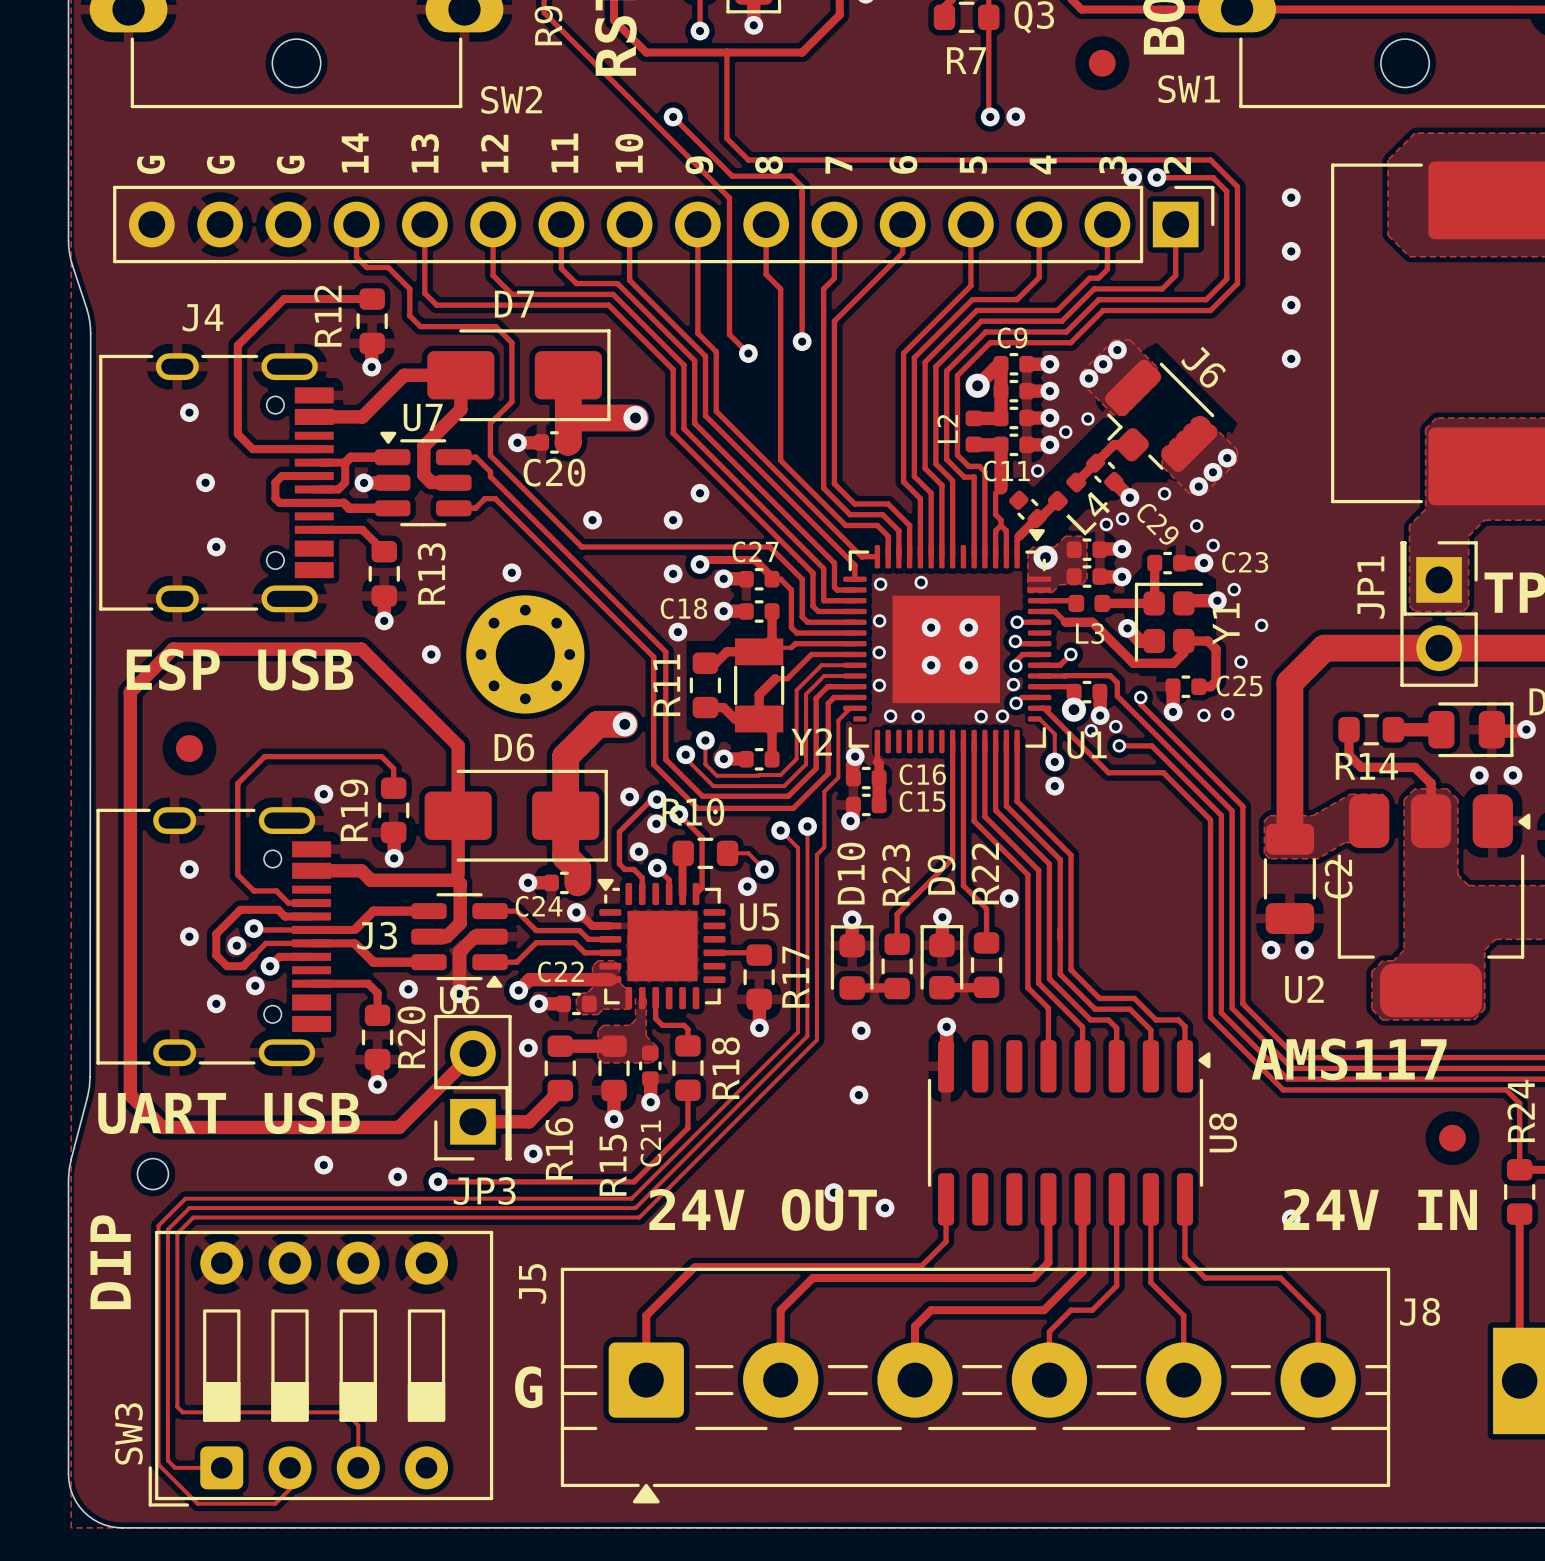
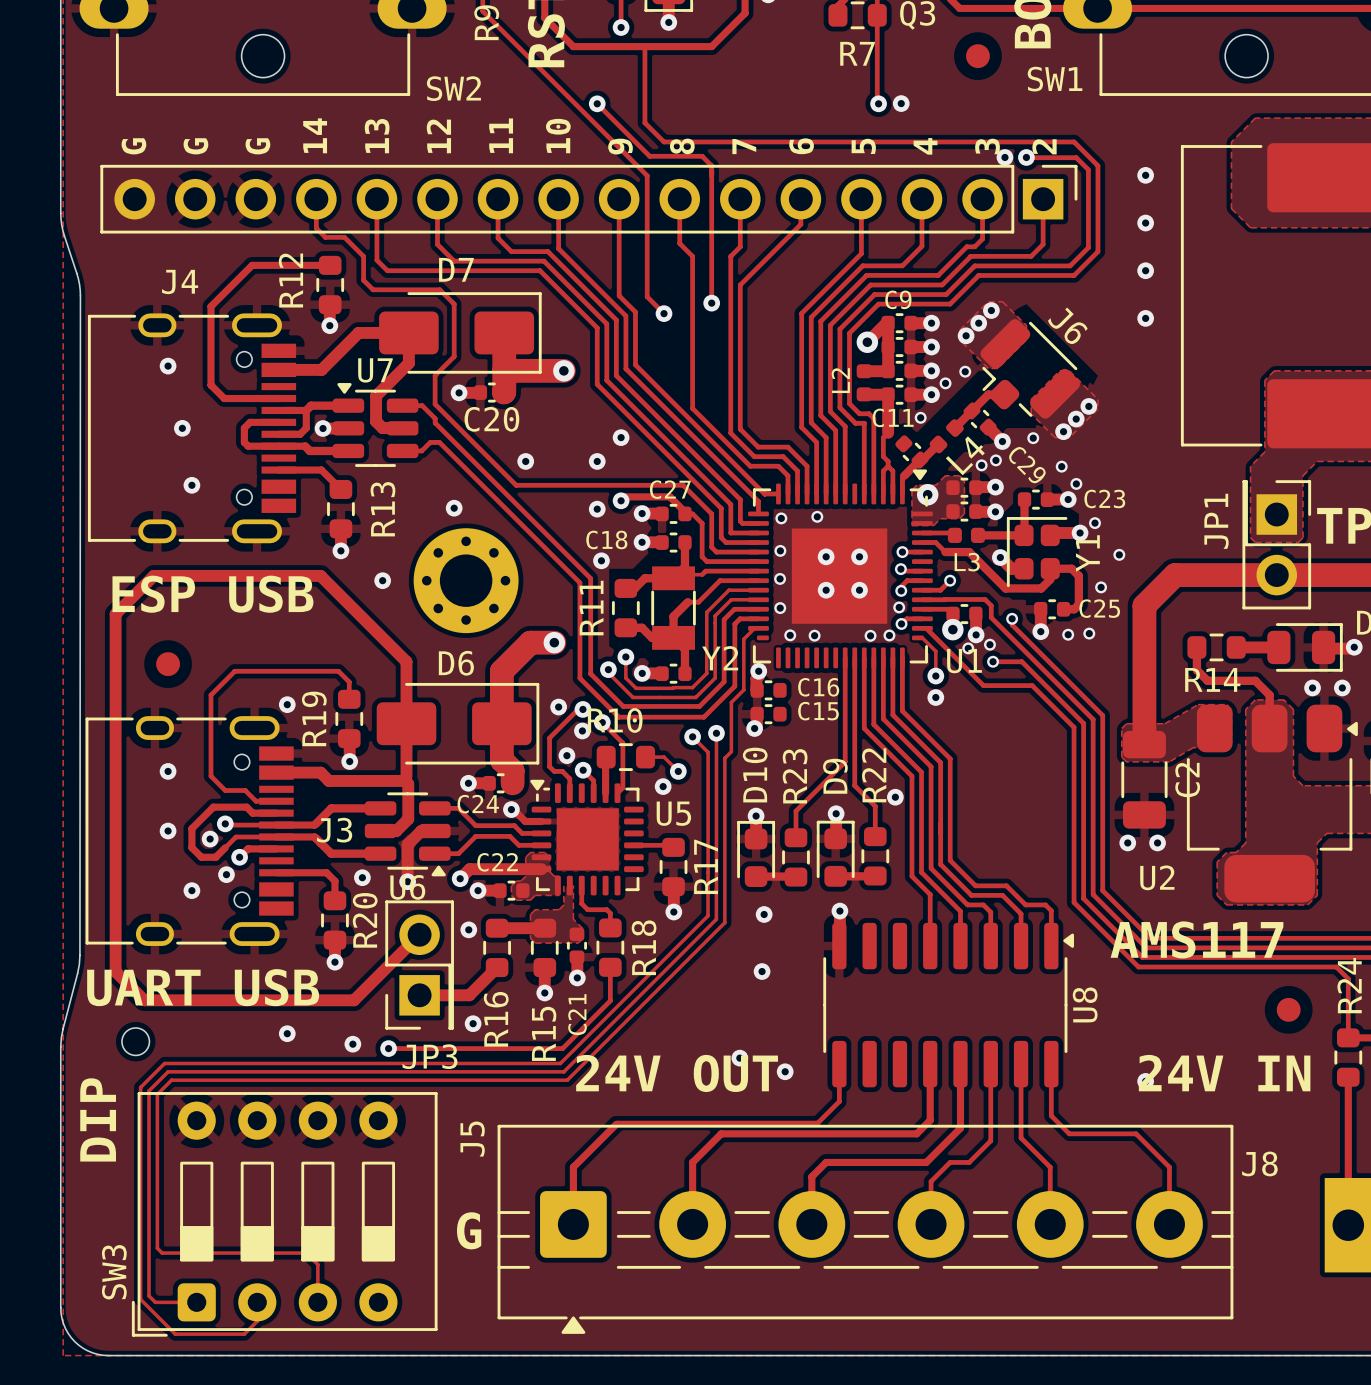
track: (877, 741) (879, 804) -> none

